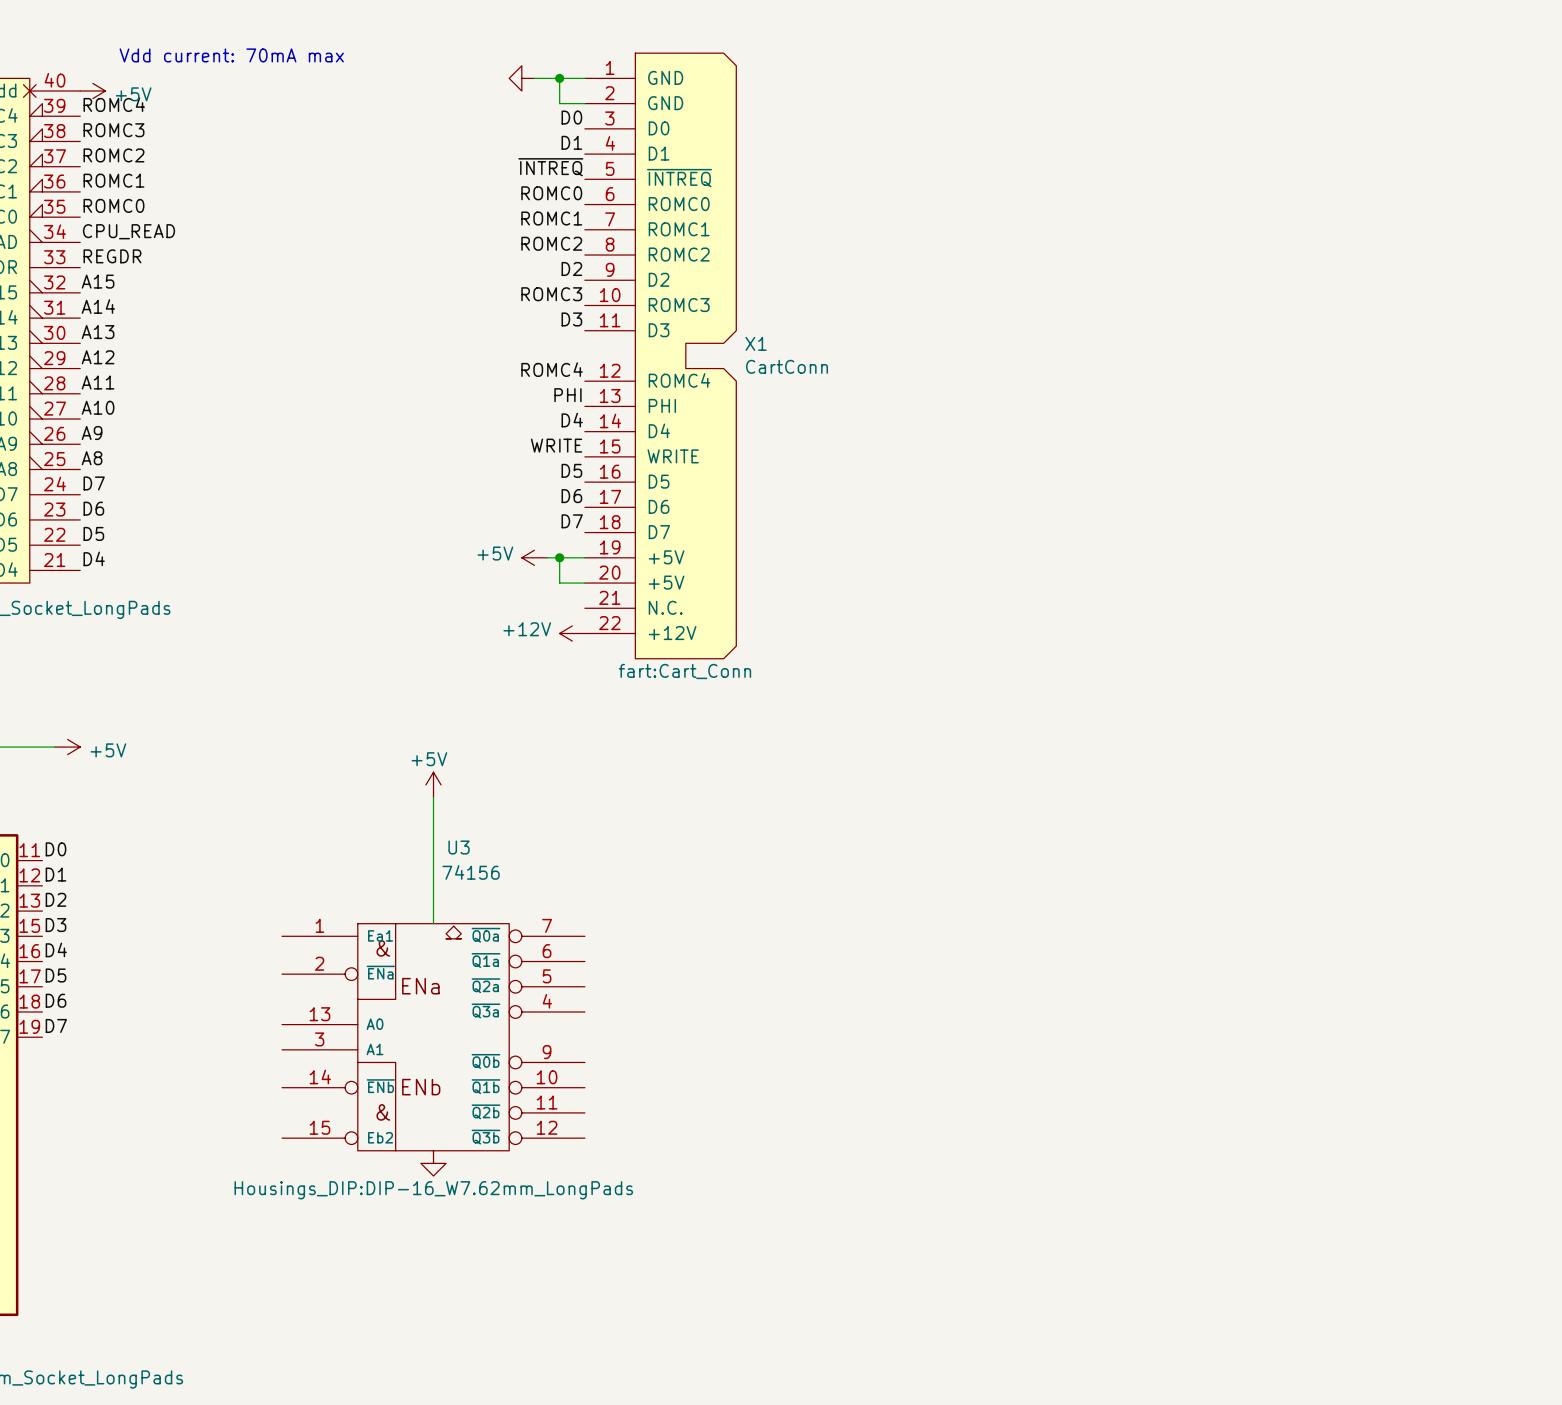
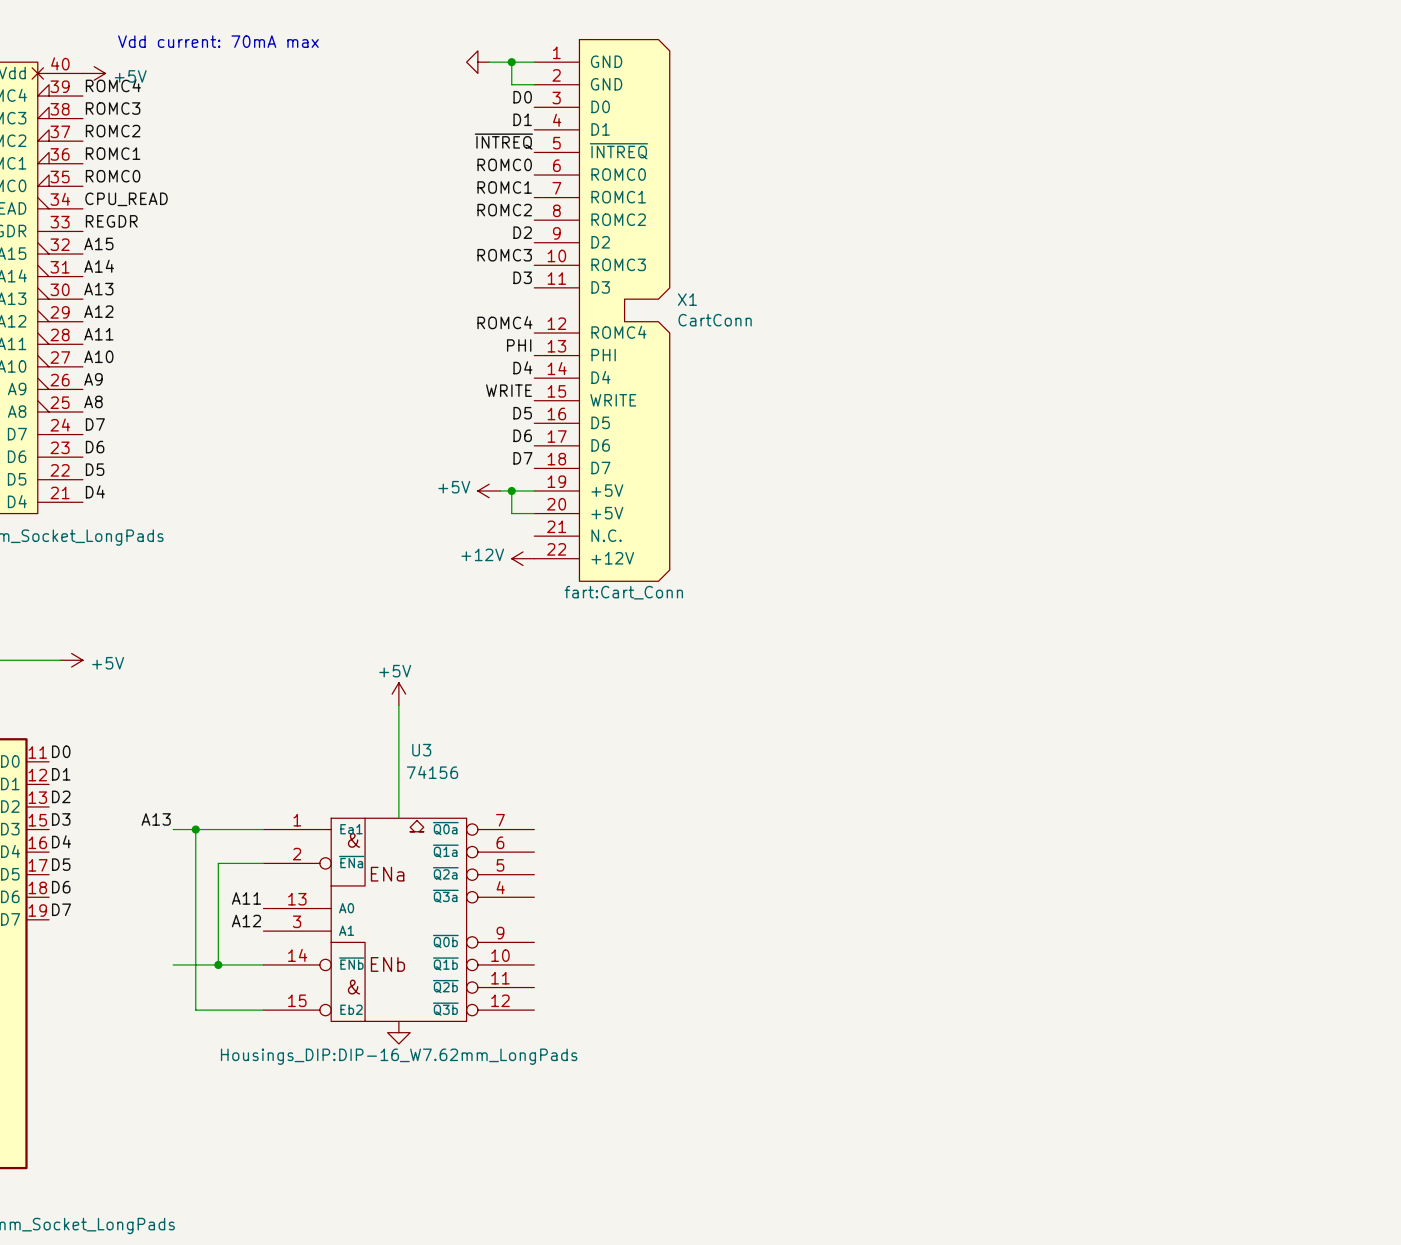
label: none -> A13 (156, 819)
wire: none -> (173, 829) (263, 829)
wire: none -> (195, 829) (195, 1010) (263, 1010)
junction: none -> (195, 829)
wire: none -> (263, 863) (218, 863) (218, 964)
label: none -> A11 (246, 898)
label: none -> A12 (246, 921)
wire: none -> (173, 964) (263, 964)
junction: none -> (218, 964)

